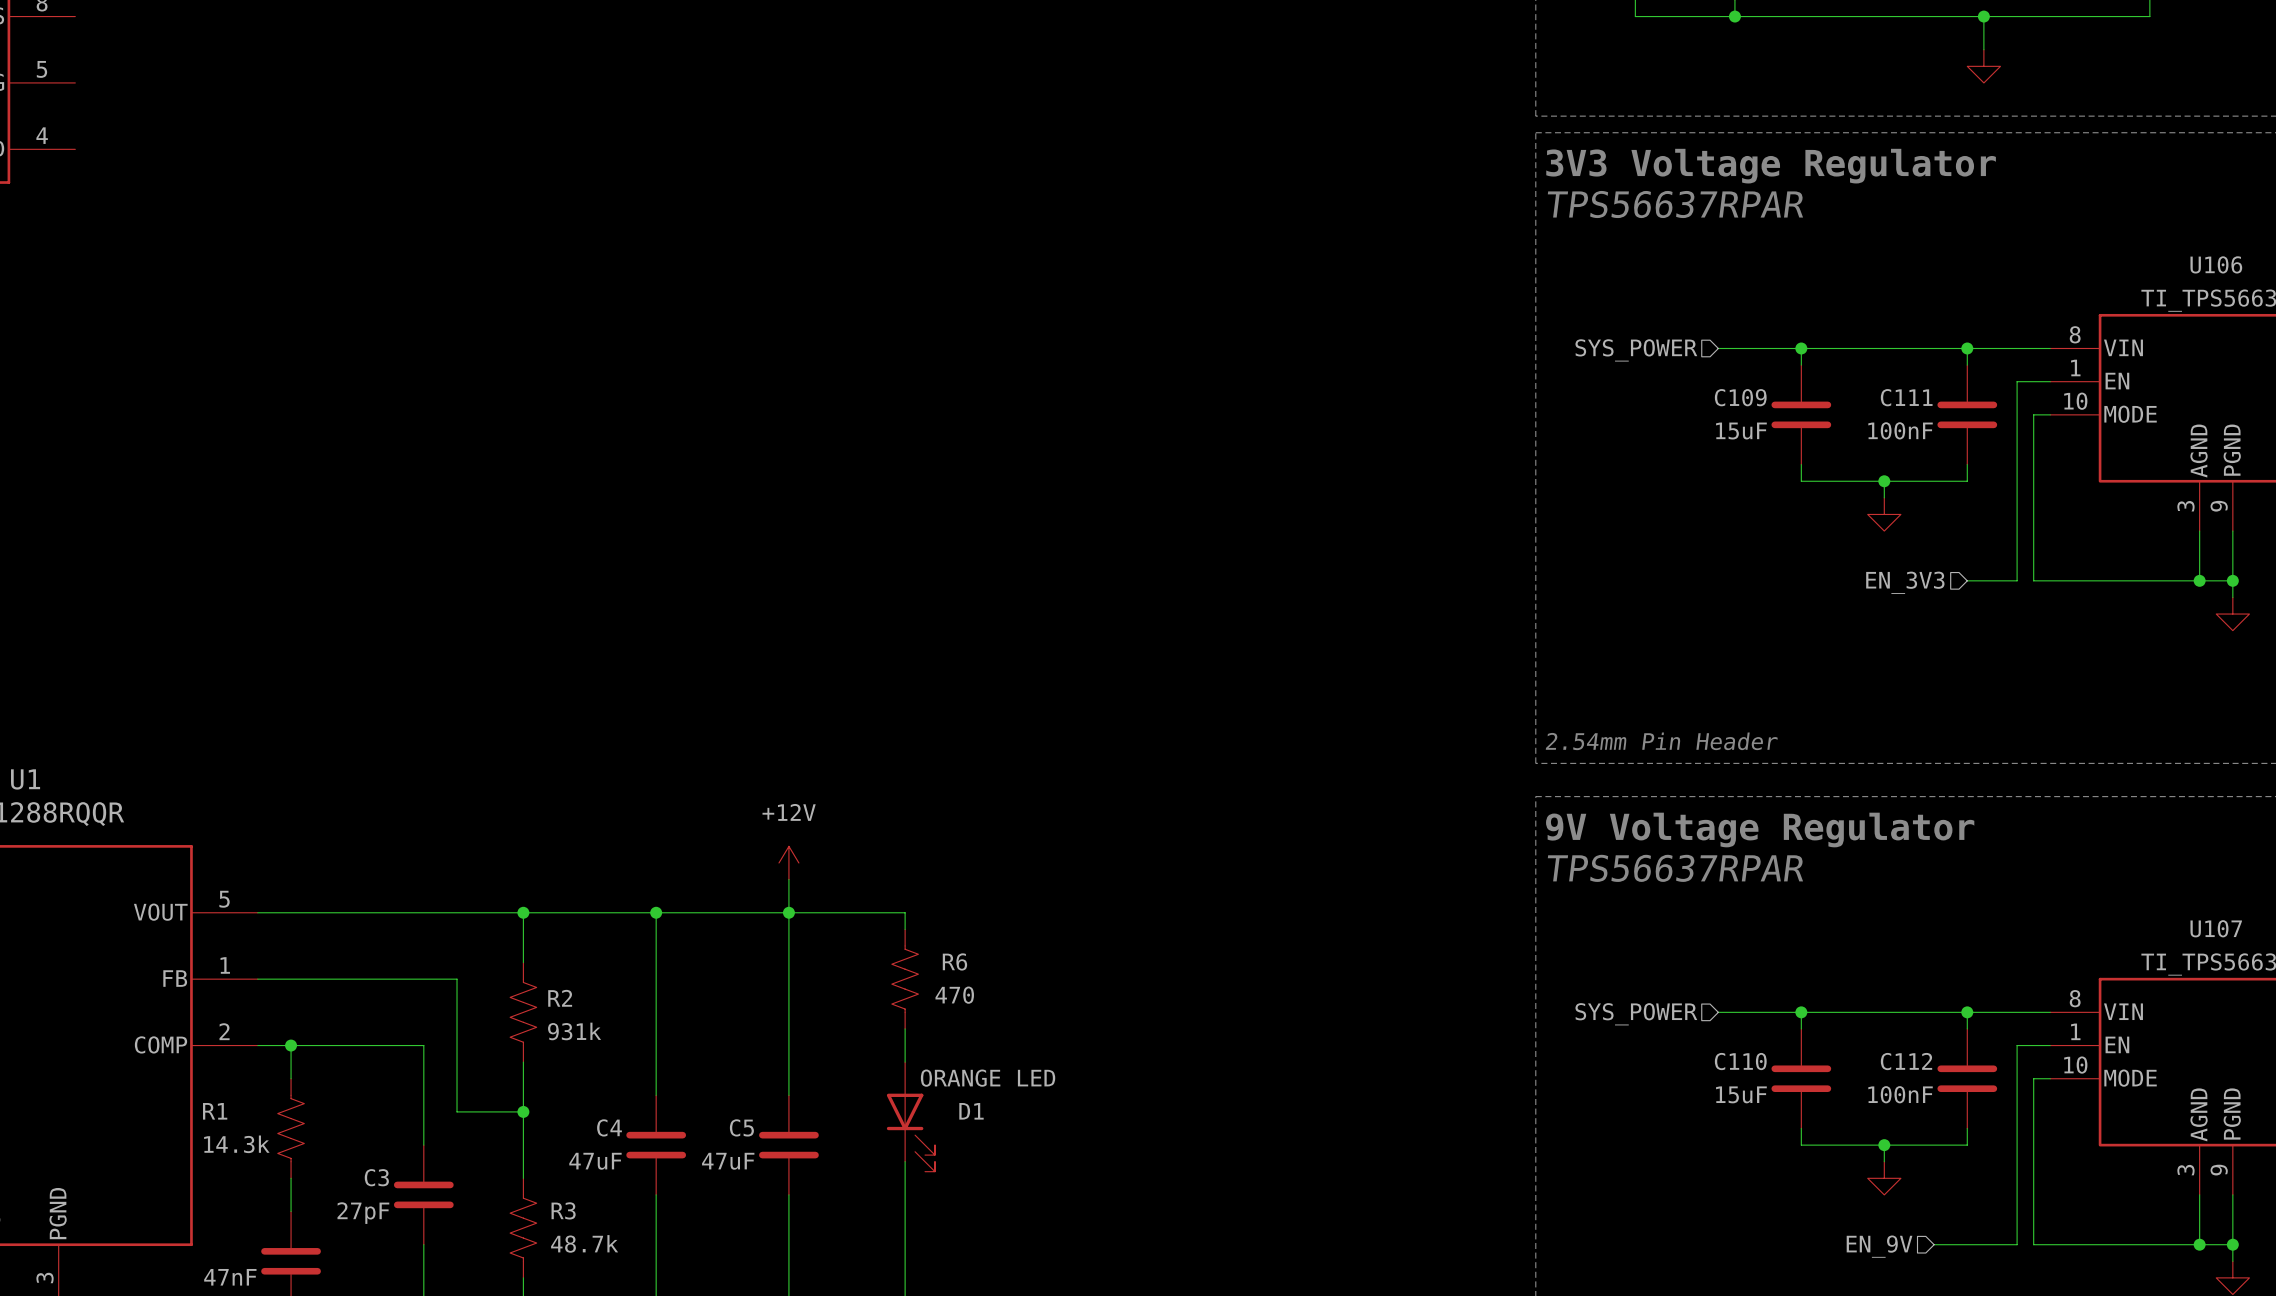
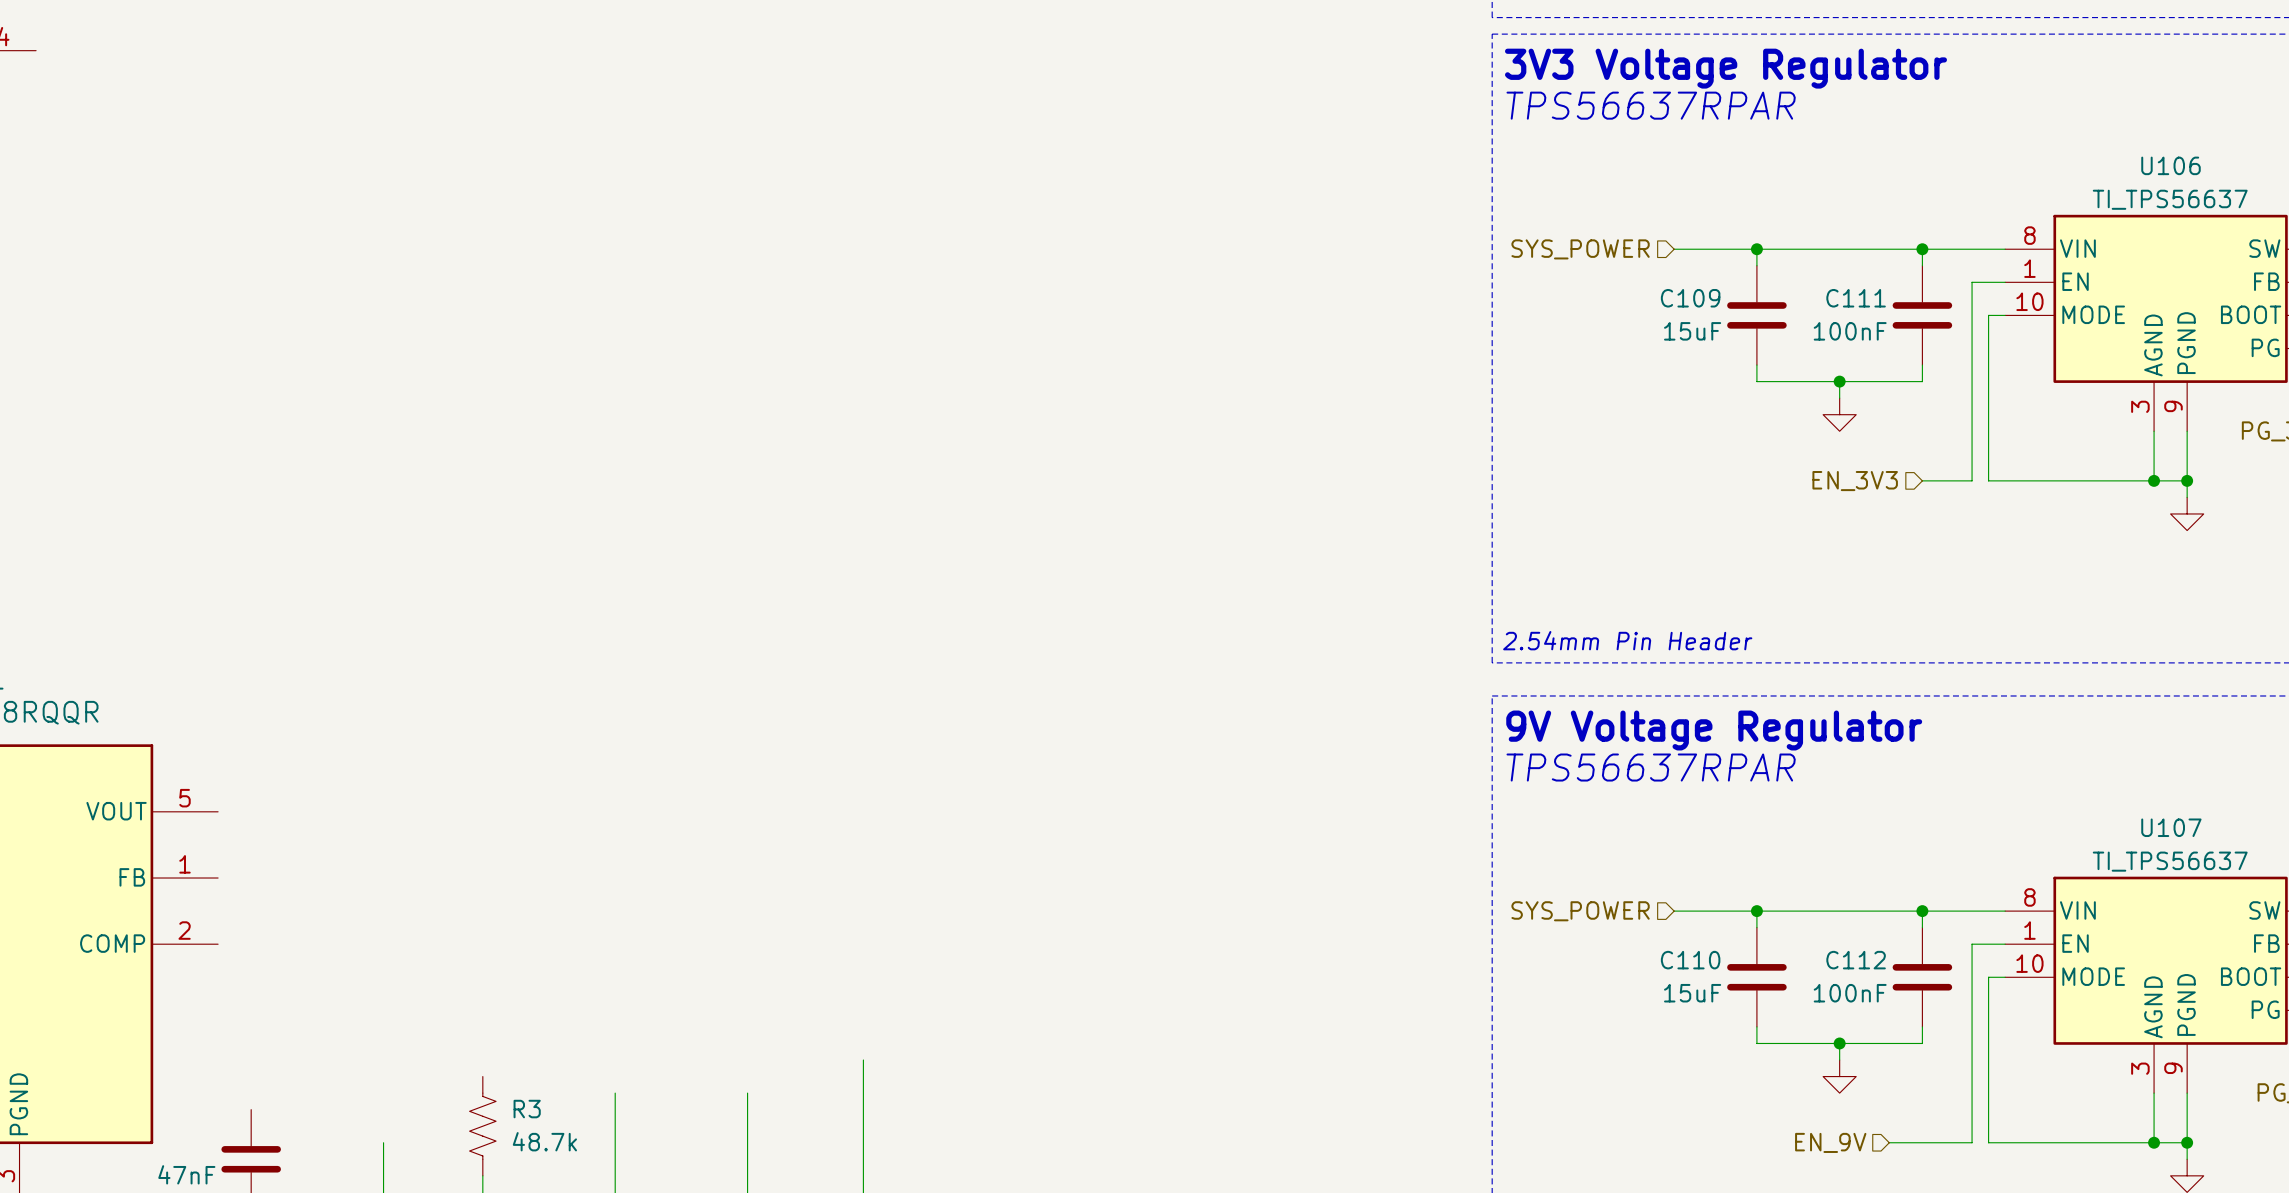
power symbol: +12V (788, 862) -> none
wire: (788, 879) (788, 1095) -> none
wire: (257, 912) (905, 912) (905, 929) -> none
wire: (523, 912) (523, 962) -> none
junction: (523, 912) -> none
wire: (656, 912) (656, 1095) -> none
junction: (656, 912) -> none
junction: (788, 912) -> none
wire: (257, 979) (457, 979) (457, 1111) (523, 1111) -> none
R6: 470 (905, 979) -> none
R2: 931k (523, 1012) -> none
wire: (905, 1028) (905, 1062) -> none
wire: (257, 1045) (423, 1045) (423, 1145) -> none
wire: (291, 1045) (291, 1078) -> none
junction: (291, 1045) -> none
wire: (523, 1062) (523, 1178) -> none
junction: (523, 1111) -> none
D1: ORANGE LED (910, 1116) -> none
R1: 14.3k (291, 1128) -> none
C4: 47uF (656, 1145) -> none
C5: 47uF (788, 1145) -> none
wire: (291, 1178) (291, 1211) -> none
C3: 27pF (423, 1194) -> none

